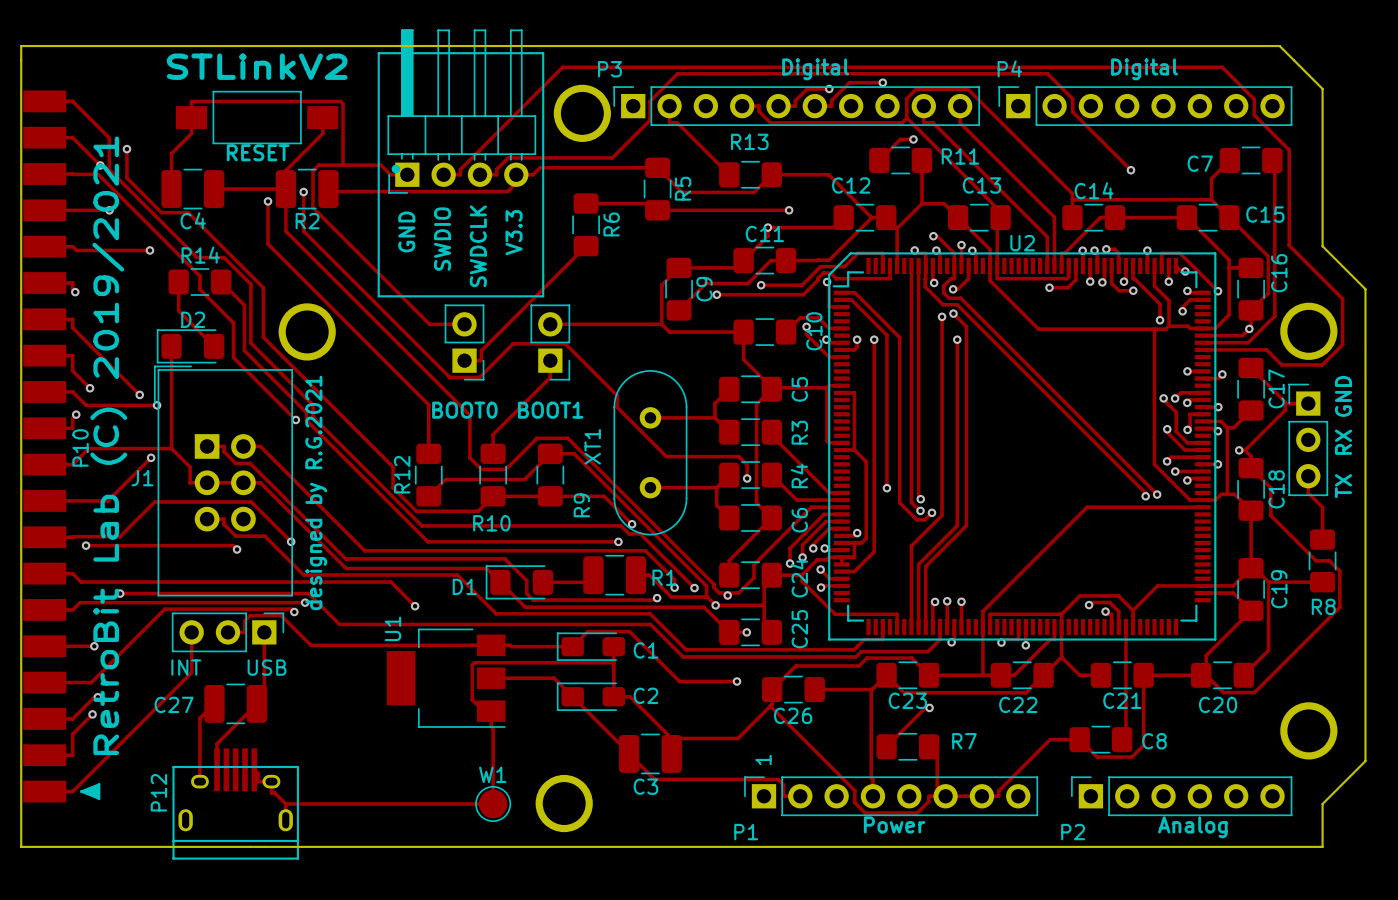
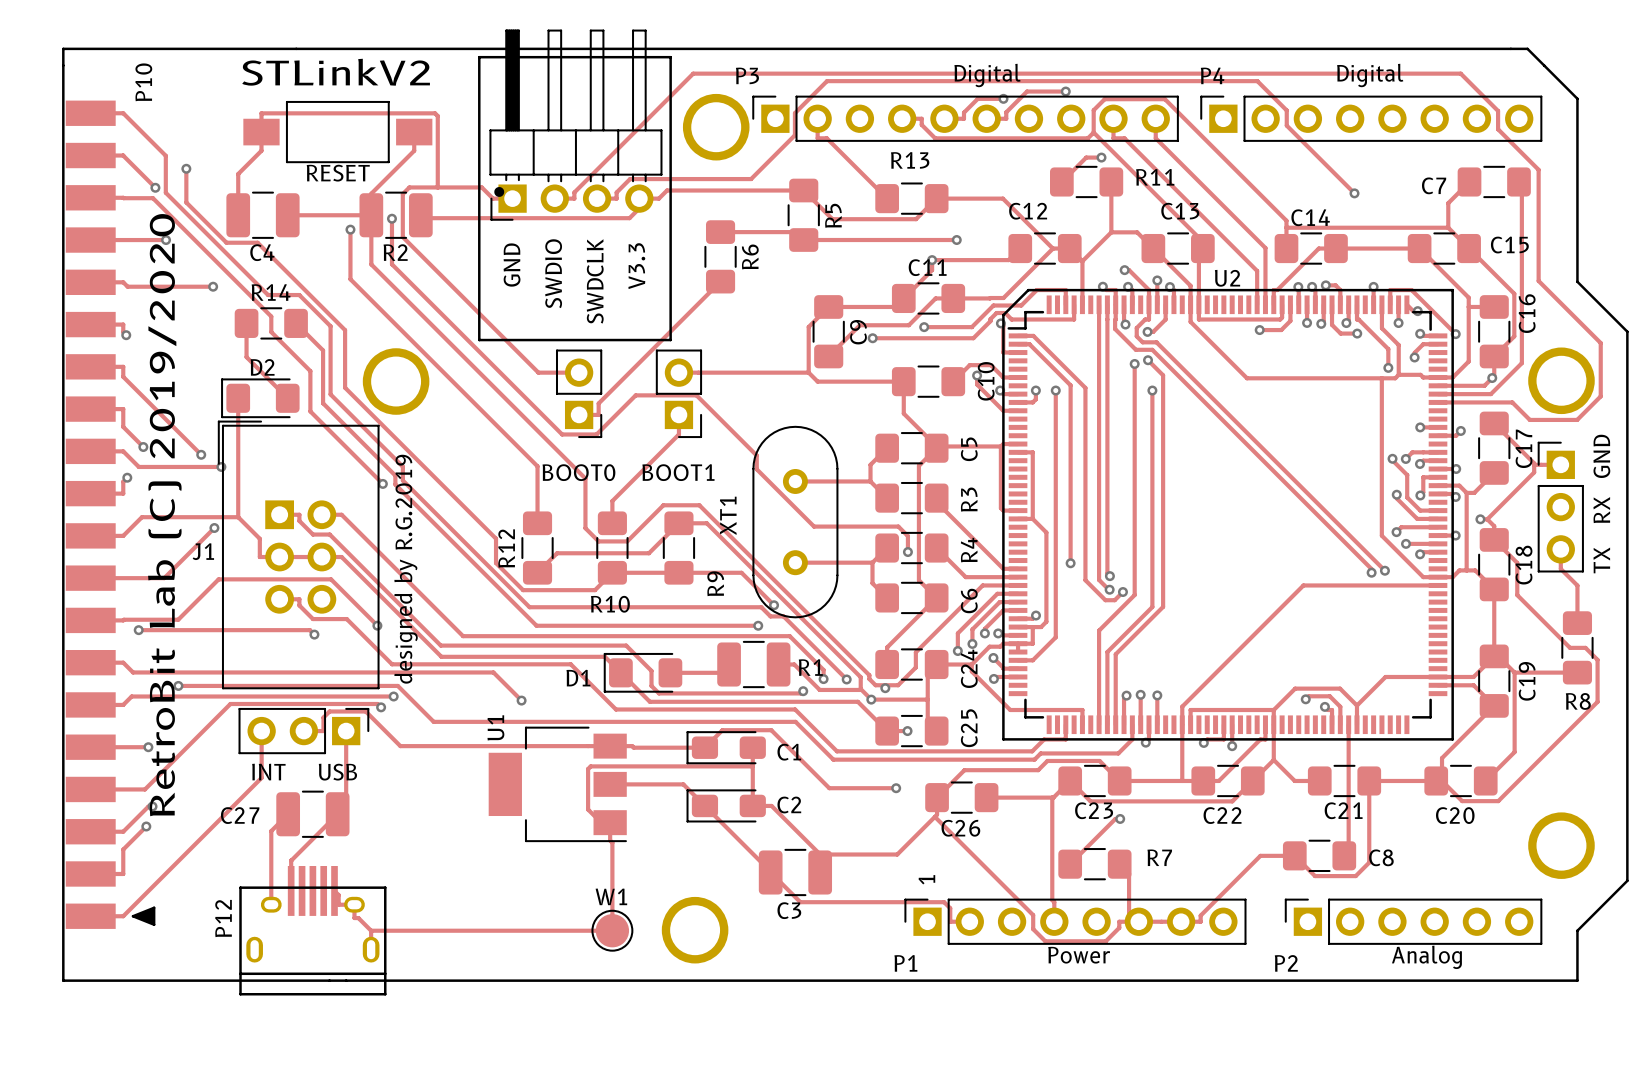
text: RetroBit Lab (C) 2019/2021 (108, 445) -> RetroBit Lab (C) 2019/2020 (164, 515)
P10 name position: P10 (80, 447) -> P10 (143, 82)
text: designed by R.G.2021 (316, 492) -> designed by R.G.2019 (406, 569)

